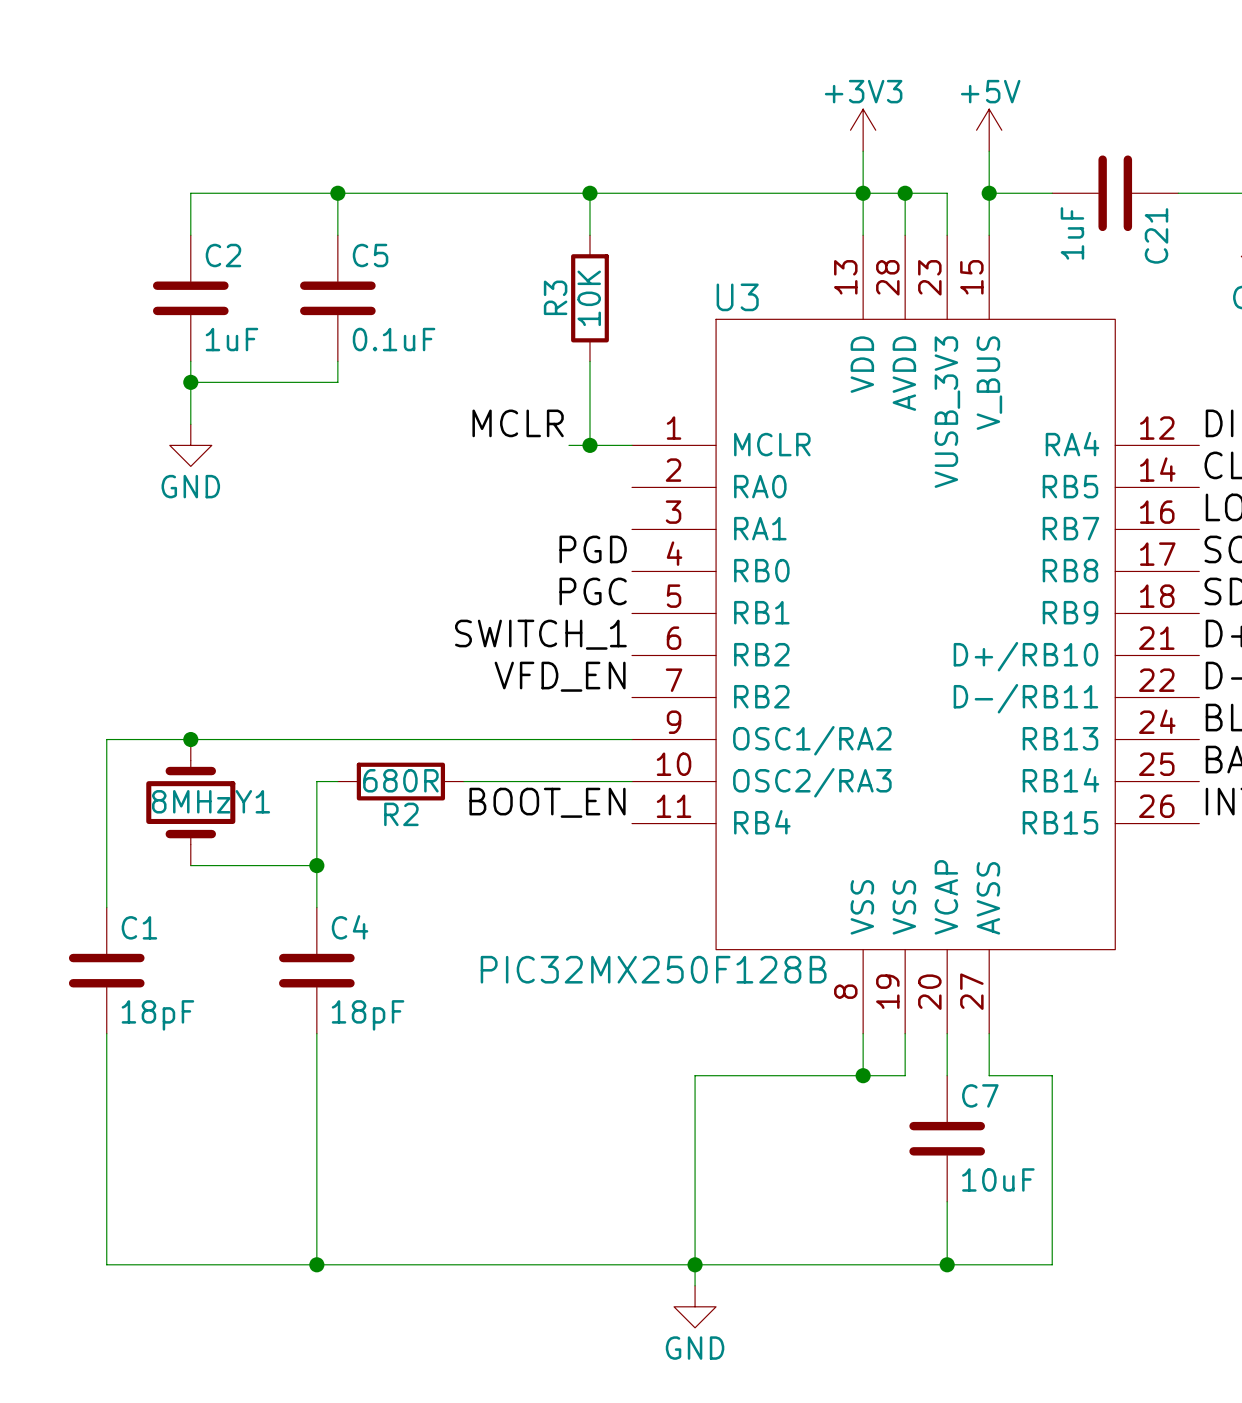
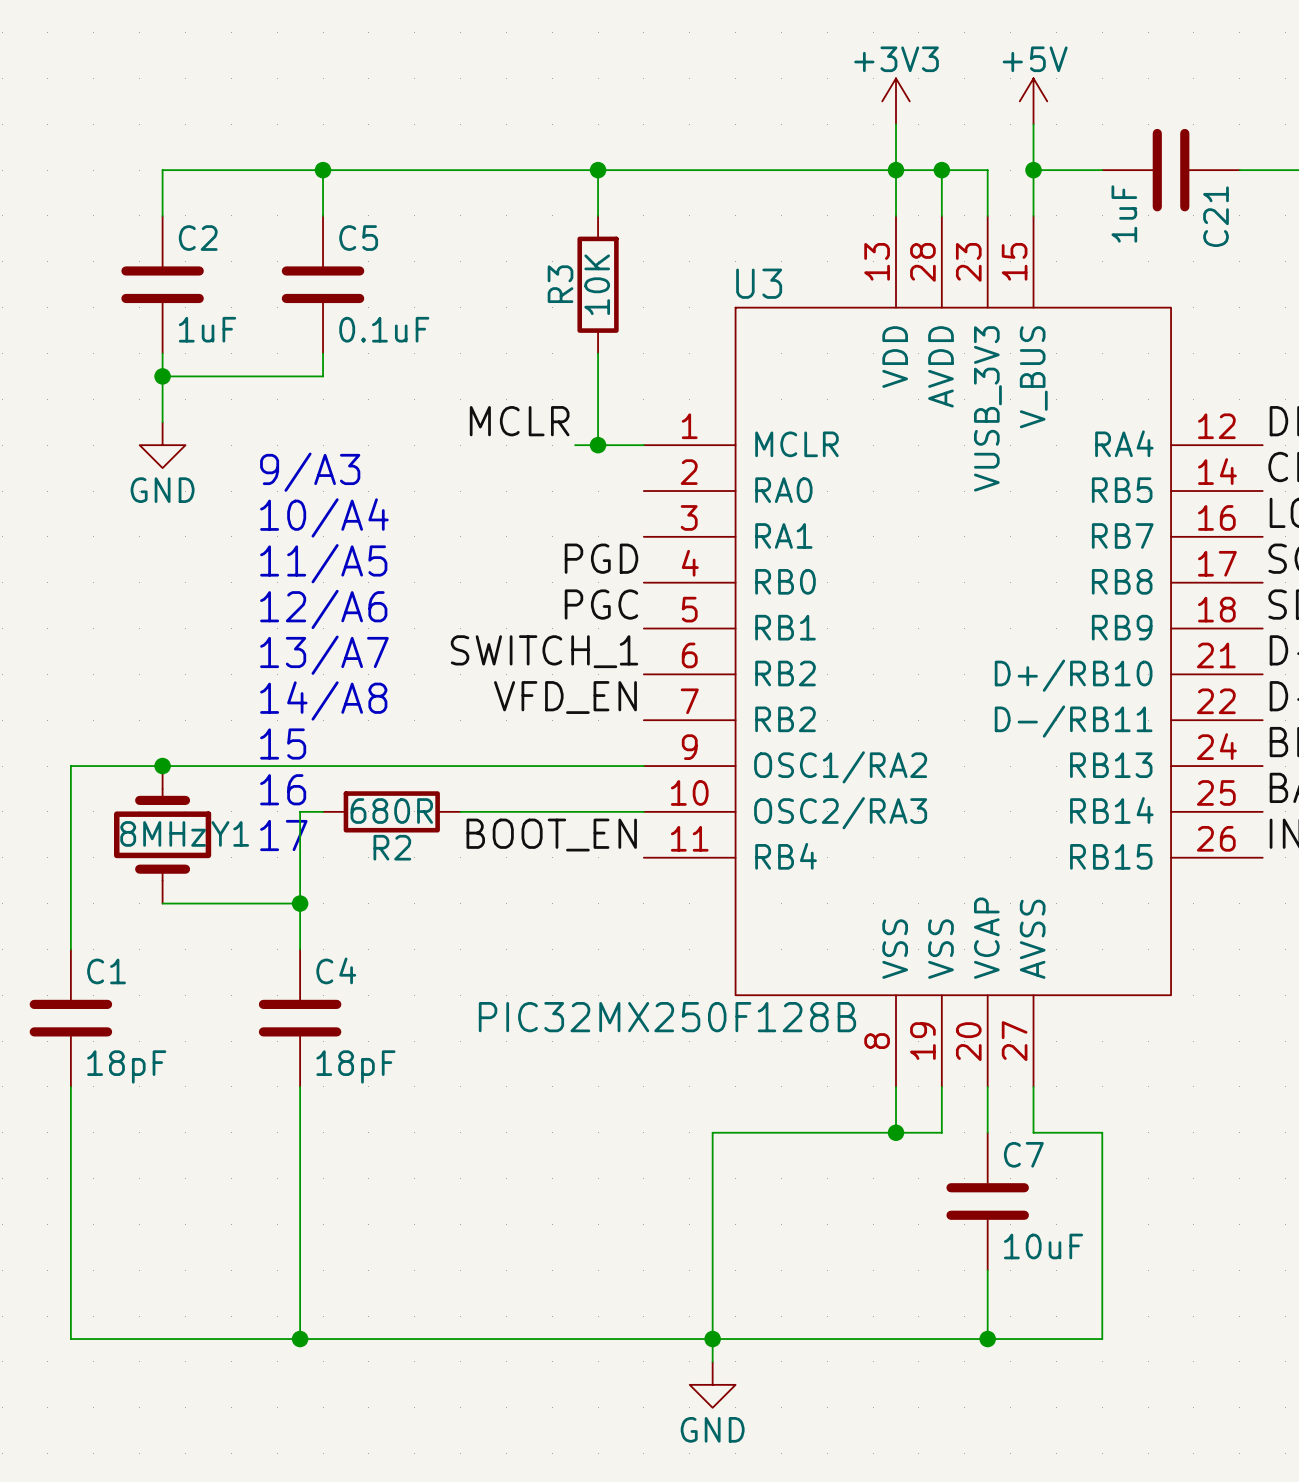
text: none -> 9/A3 (310, 472)
text: none -> 10/A4 (324, 517)
text: none -> 11/A5 (323, 563)
text: none -> 12/A6 (323, 609)
text: none -> 13/A7 (324, 655)
text: none -> 14/A8 (323, 700)
text: none -> 15 (283, 744)
text: none -> 16 (283, 789)
text: none -> 17 (283, 835)

